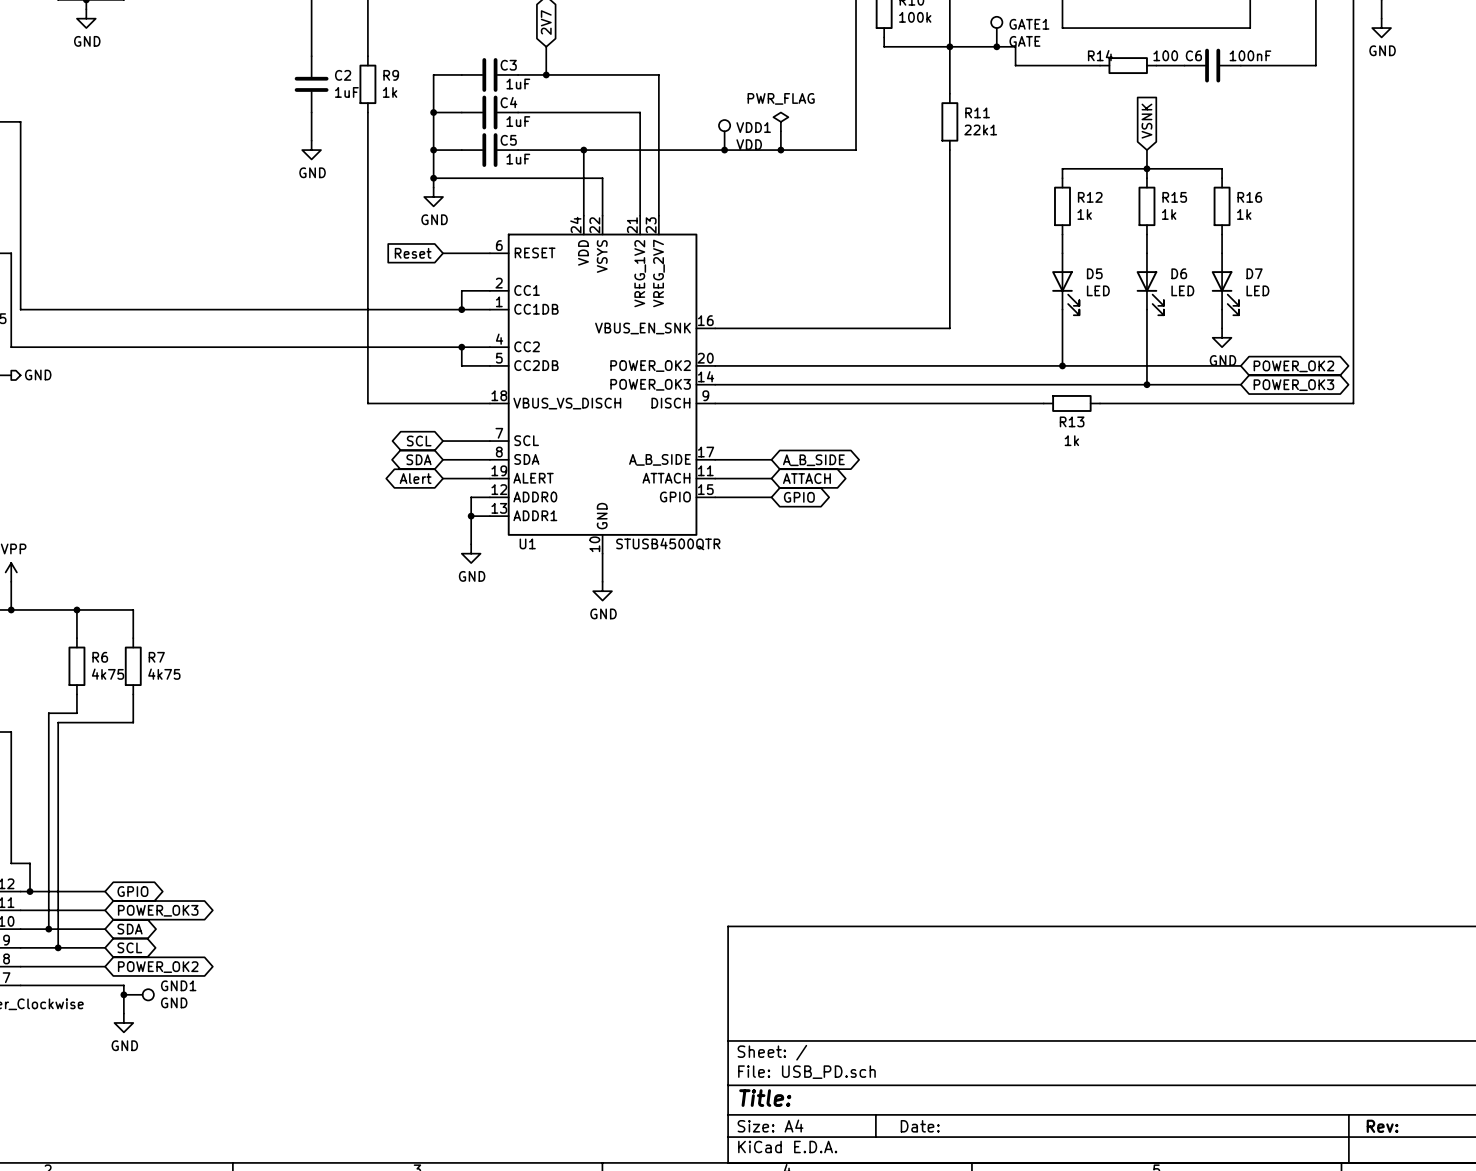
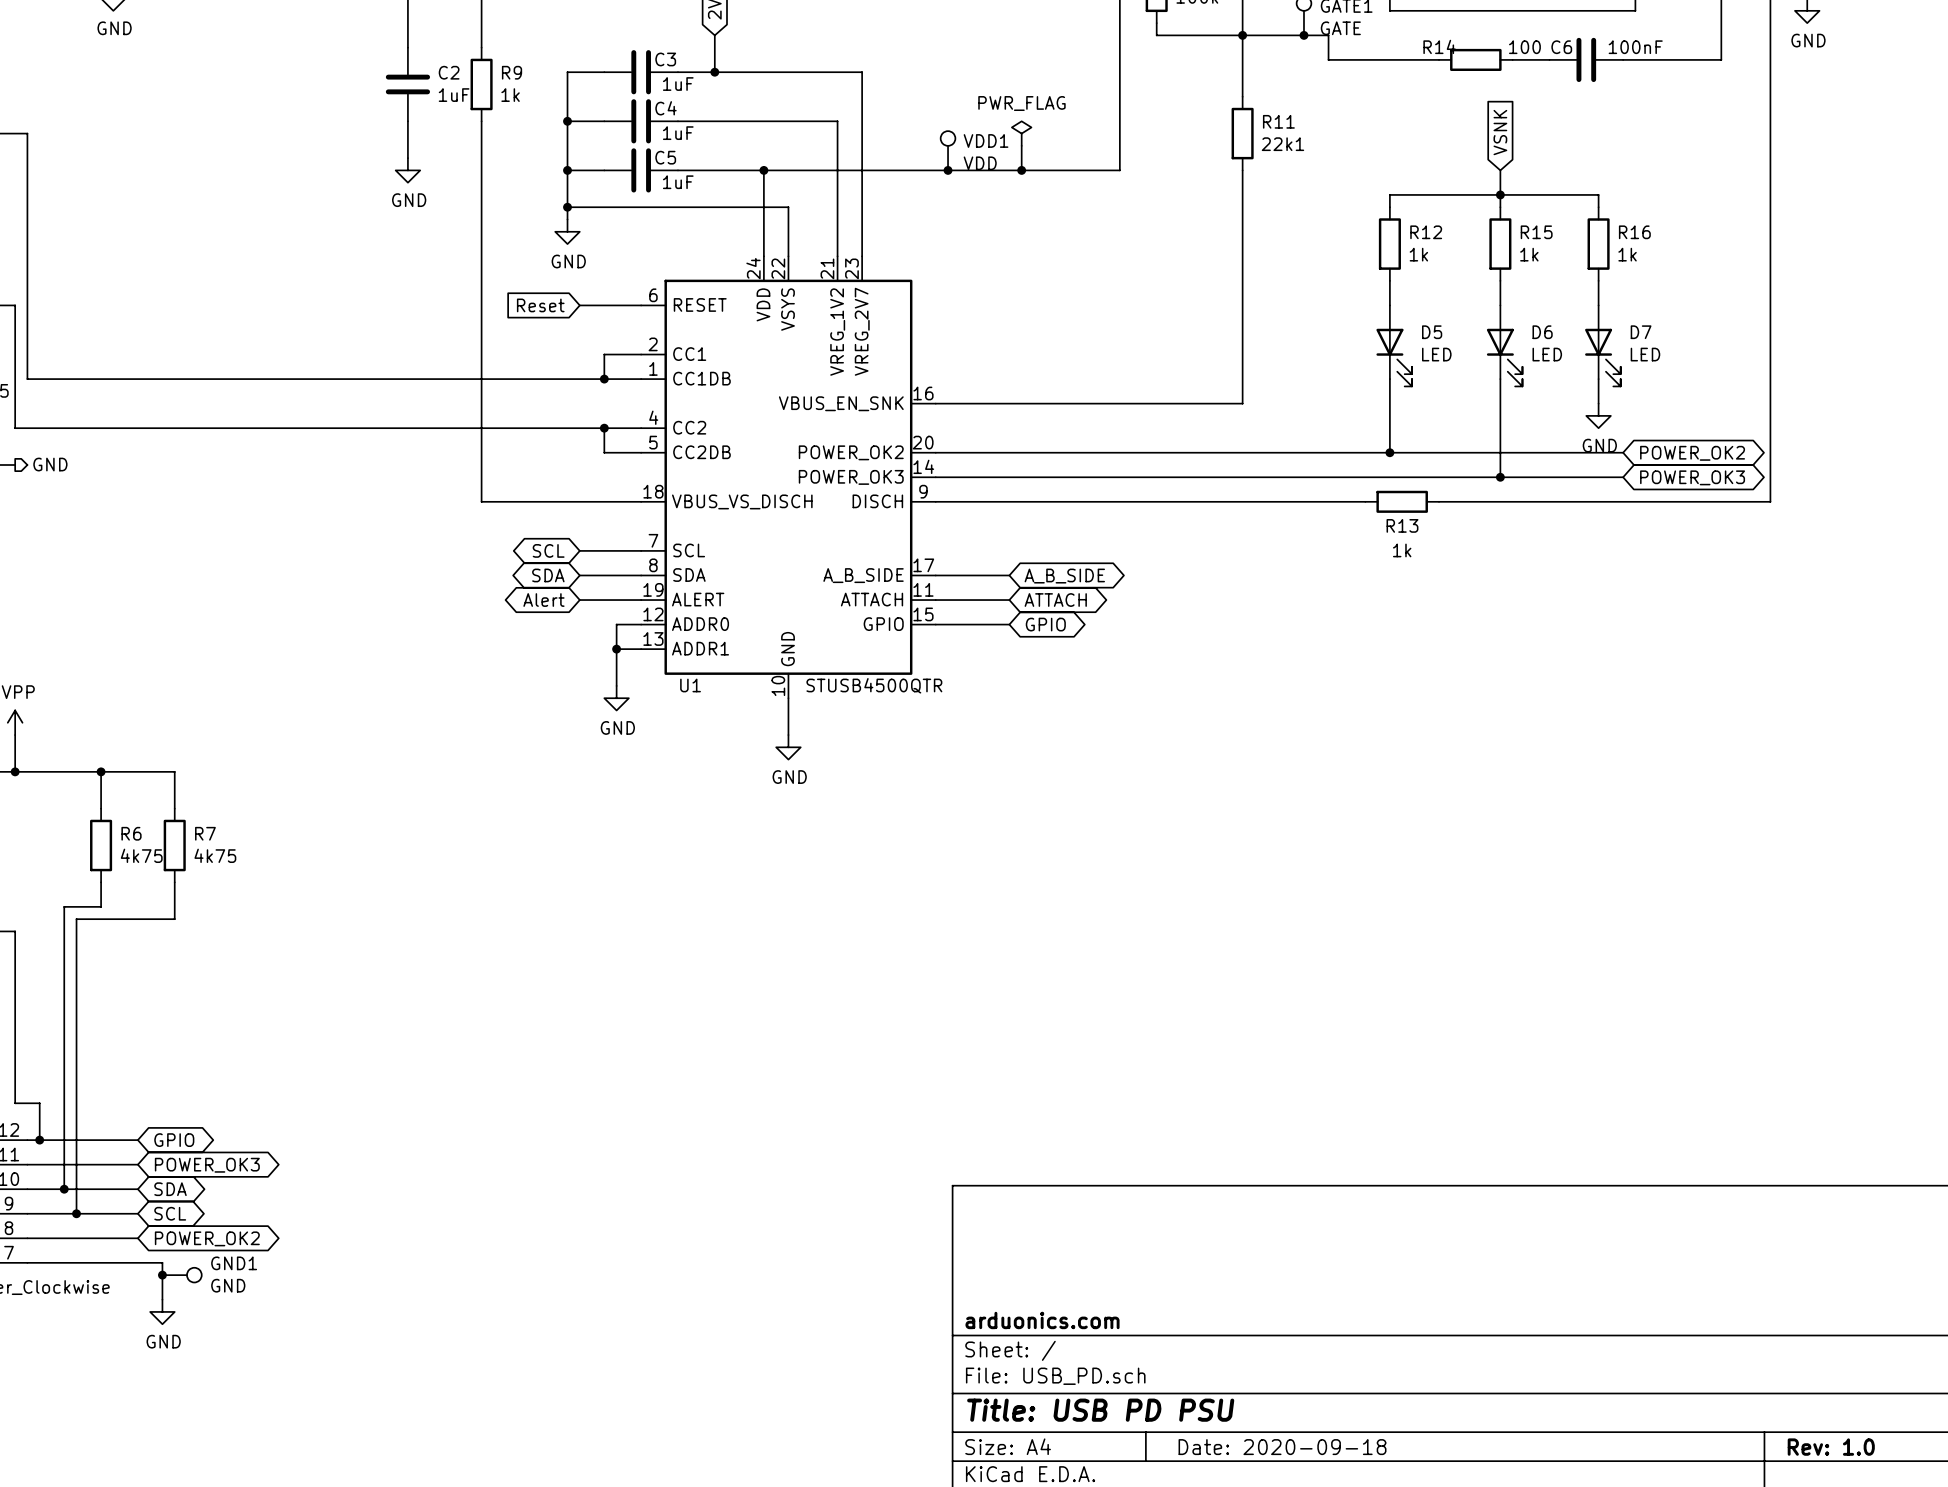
title block: none -> arduonics.com (1042, 1320)
title block: Title: (765, 1098) -> Title: USB PD PSU (1100, 1410)
title block: Date: (920, 1126) -> Date: 2020-09-18 (1282, 1447)
title block: Rev: (1382, 1126) -> Rev: 1.0 (1831, 1447)

